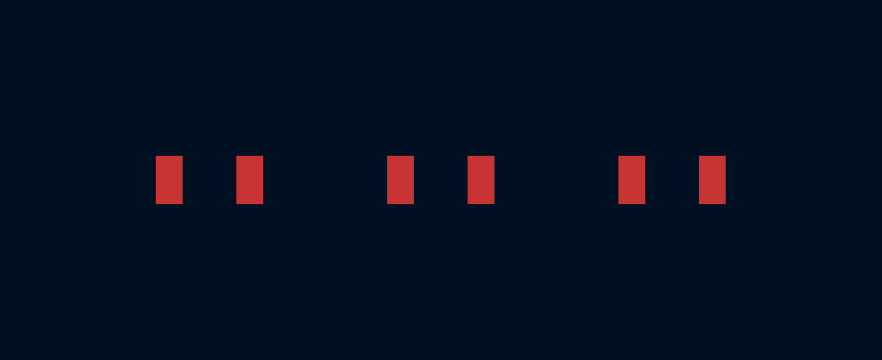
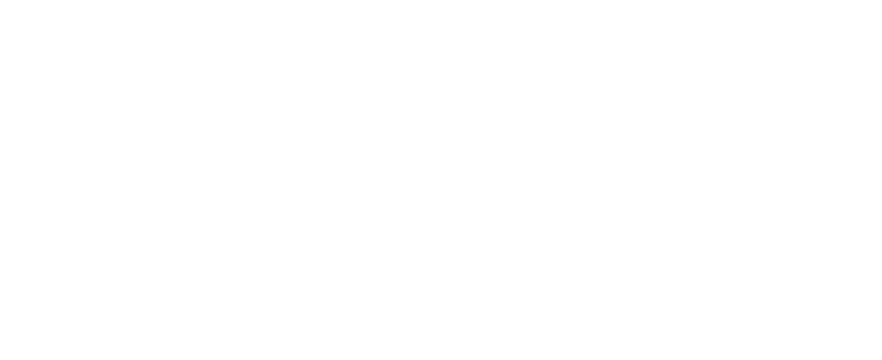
part: (209, 179) -> none
part: (440, 179) -> none
part: (672, 179) -> none

